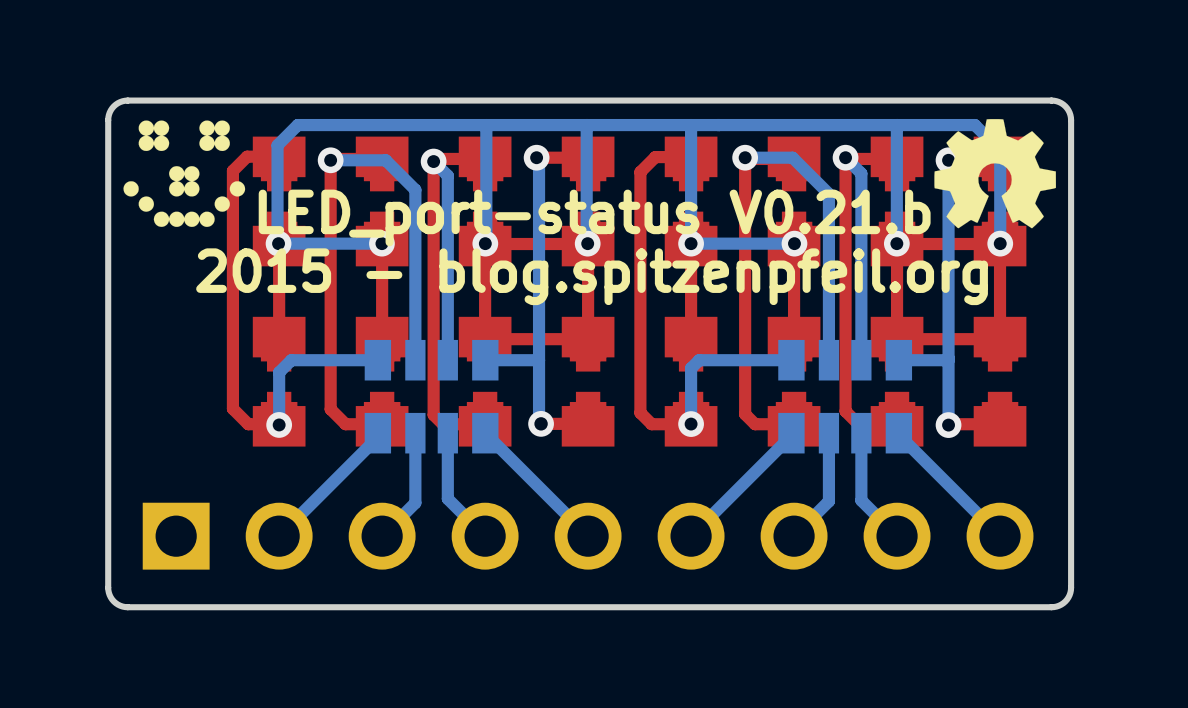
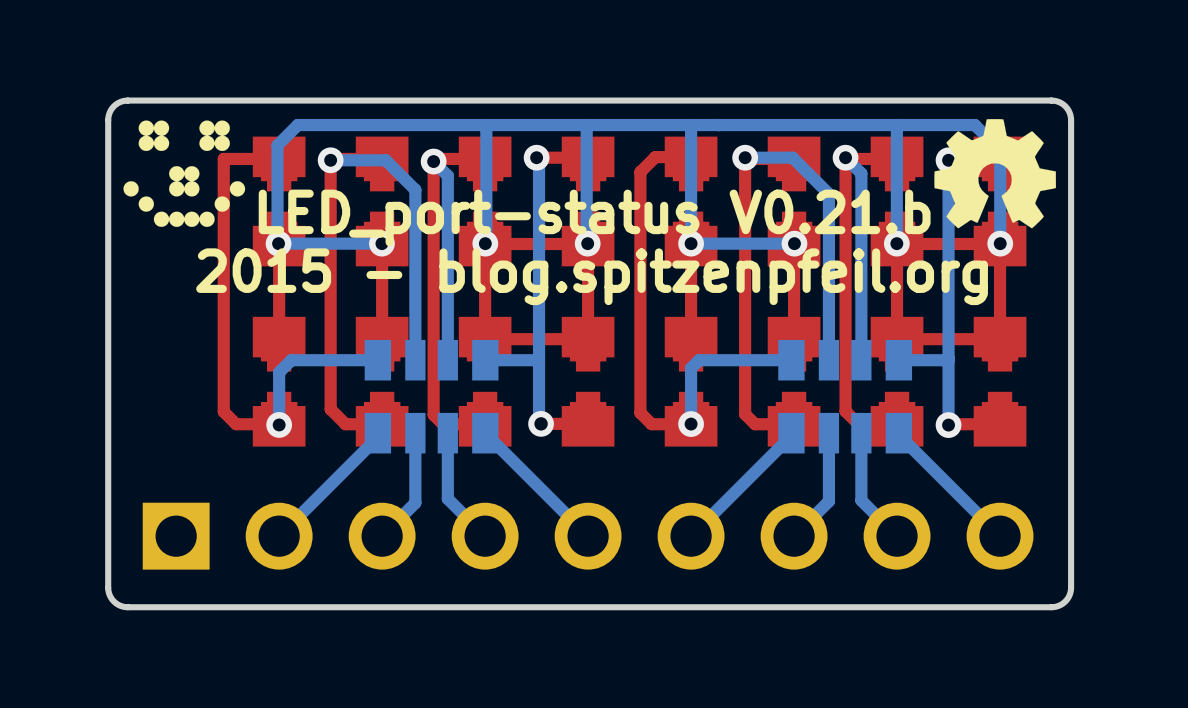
top track: (279, 158) (276, 156) (247, 156) (232, 170) (232, 408) (248, 424) -> (279, 158) (223, 158) (223, 411) (236, 424) (248, 424)

